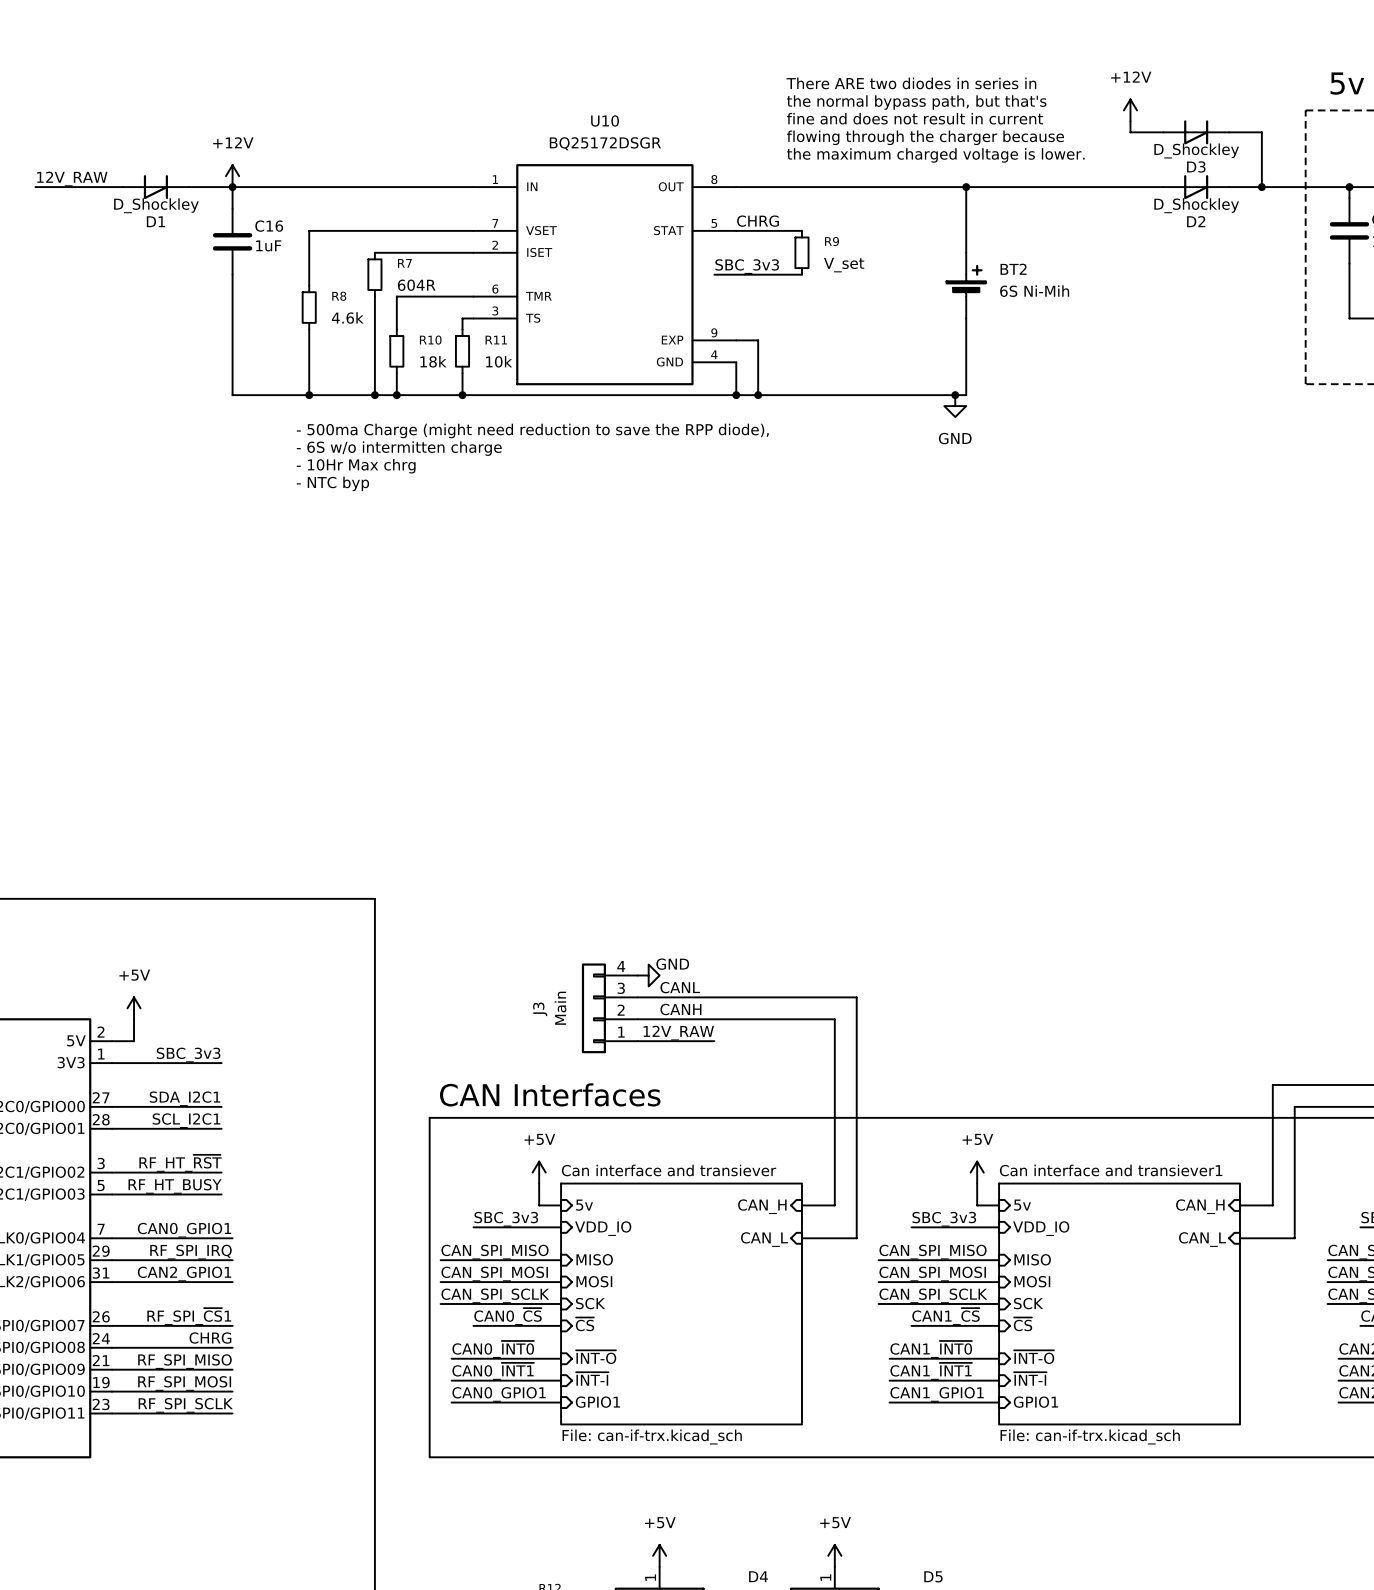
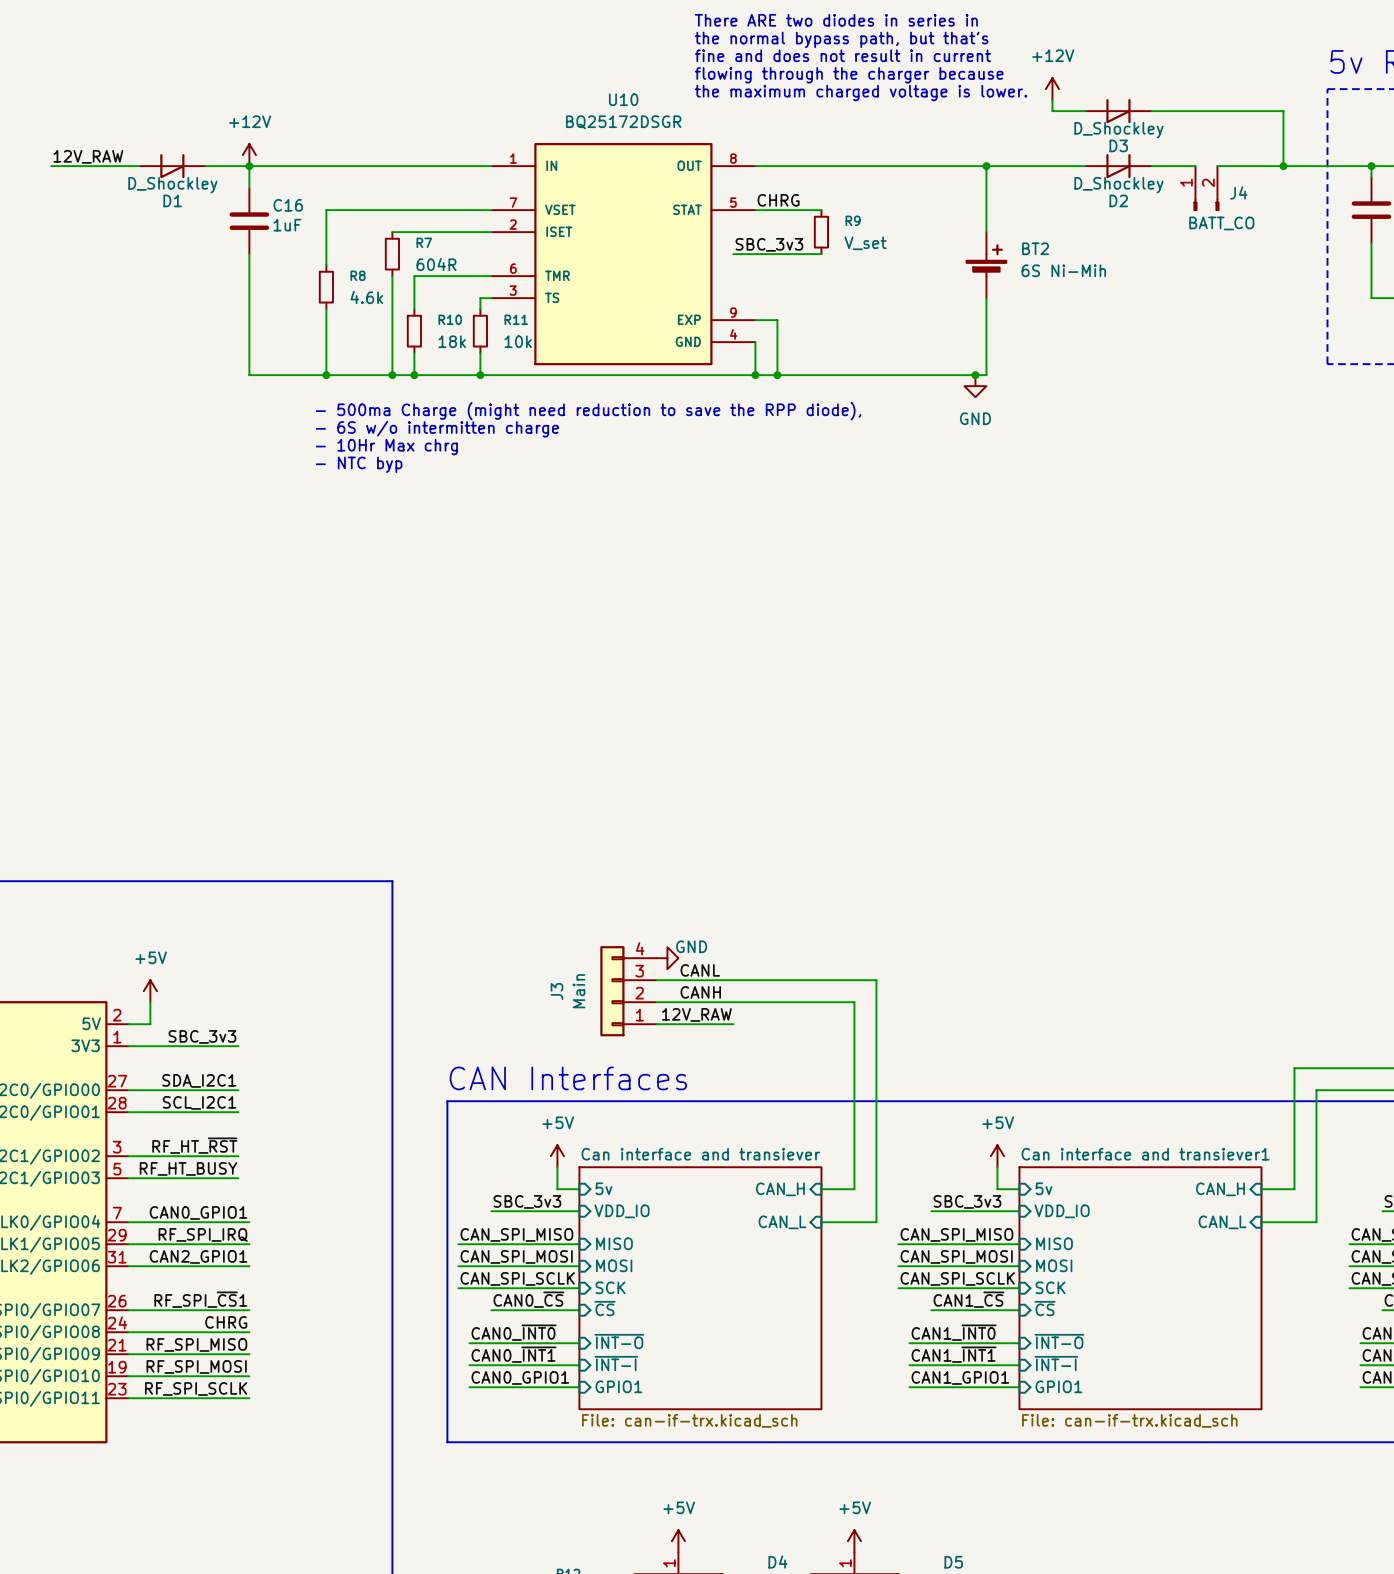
text position: There ARE two diodes in series in (911, 83) -> There ARE two diodes in series in (836, 20)
text position: the normal bypass path, but that's (916, 102) -> the normal bypass path, but that's (841, 39)
power symbol position: +12V (1130, 110) -> +12V (1052, 89)
text position: fine and does not result in current (915, 118) -> fine and does not result in current (842, 55)
wire: none -> (1052, 100) (1052, 111) (1085, 111)
wire: (1130, 121) (1130, 132) -> none
D3 position: (1196, 132) -> (1118, 111)
text position: flowing through the charger because (925, 137) -> flowing through the charger because (849, 75)
text position: the maximum charged voltage is lower. (935, 155) -> the maximum charged voltage is lower. (861, 93)
D2 position: (1196, 187) -> (1118, 166)
J4: none -> BATT_CO (1206, 188)

